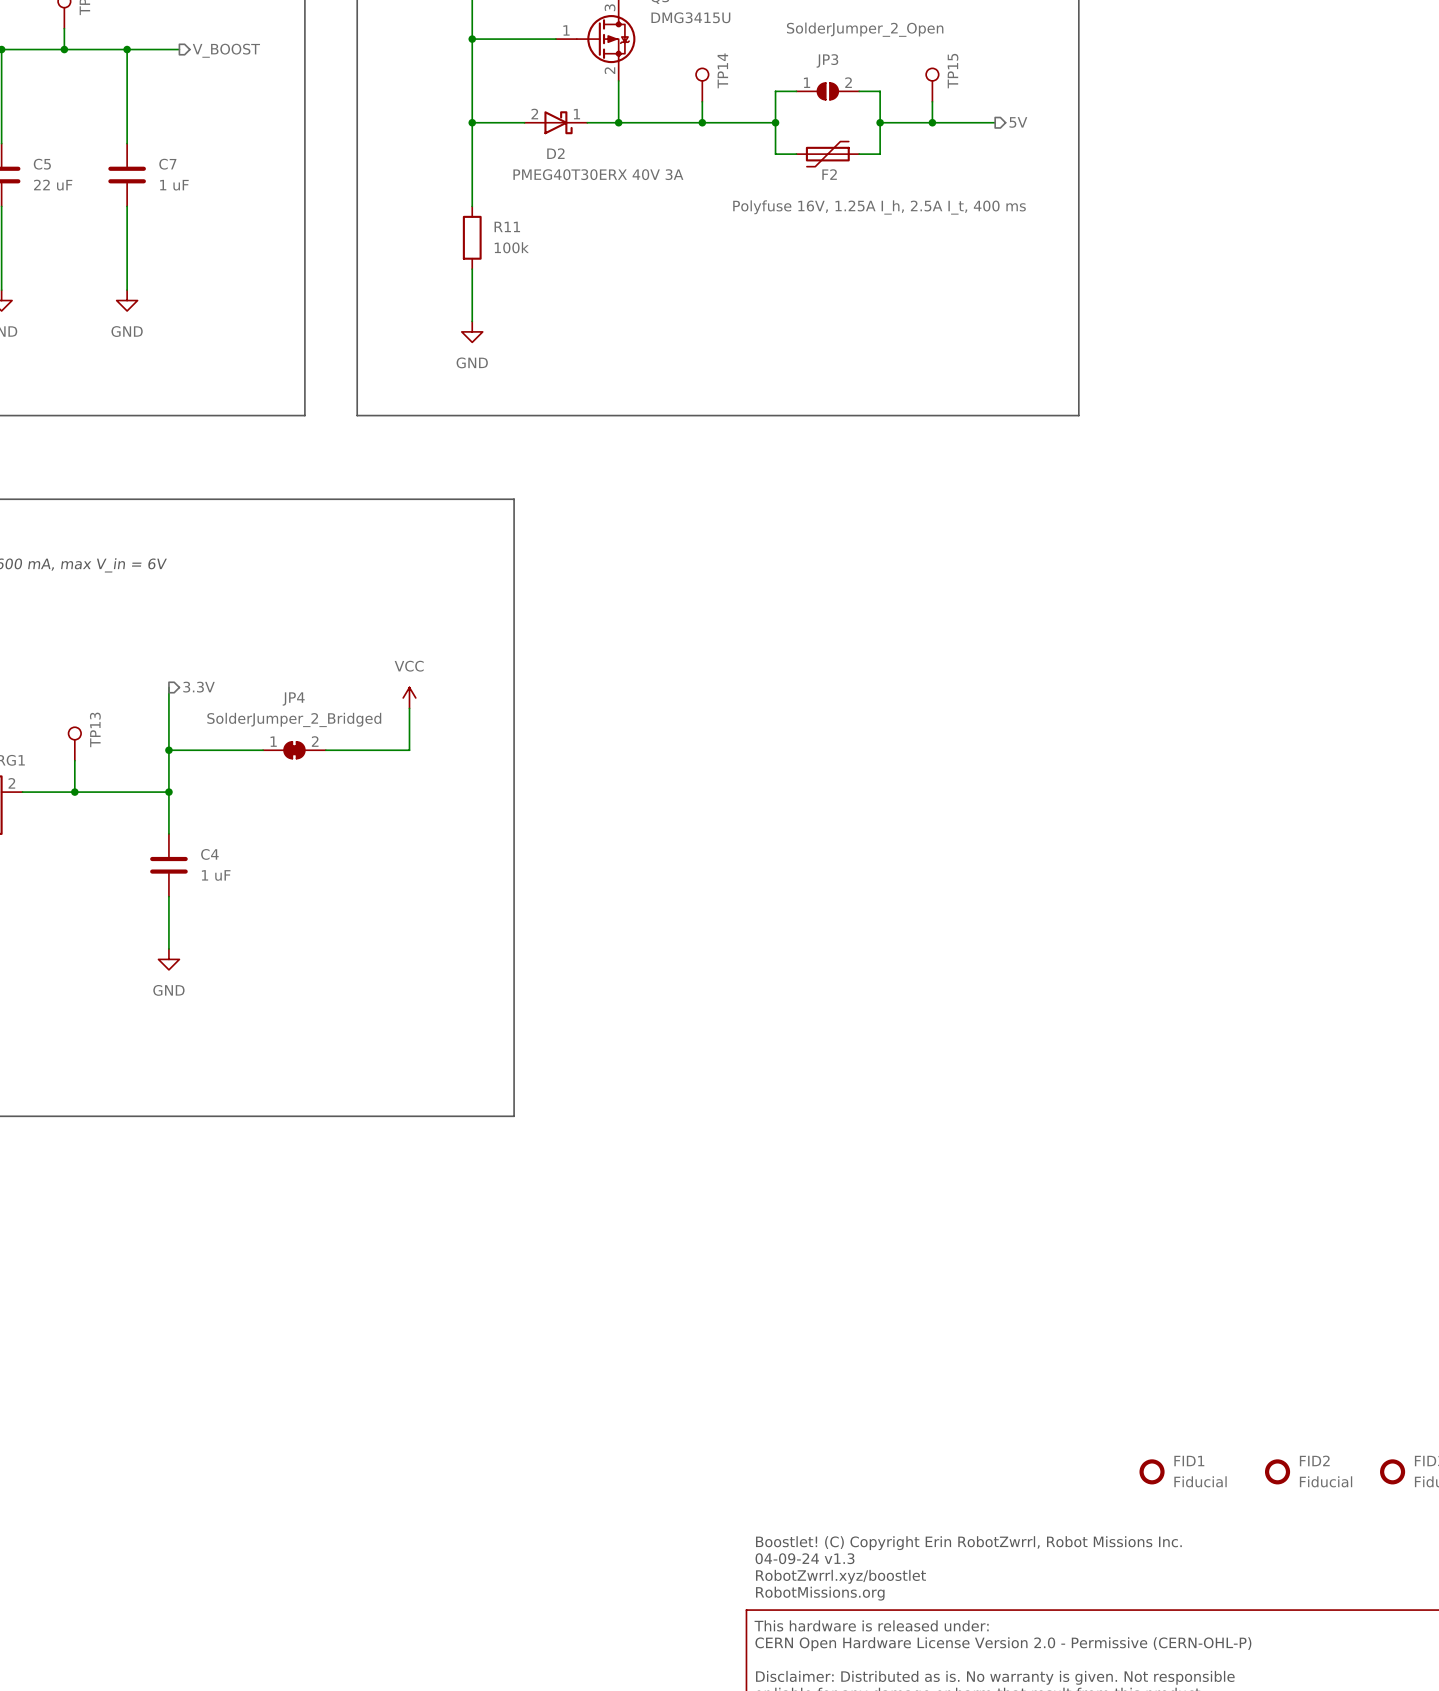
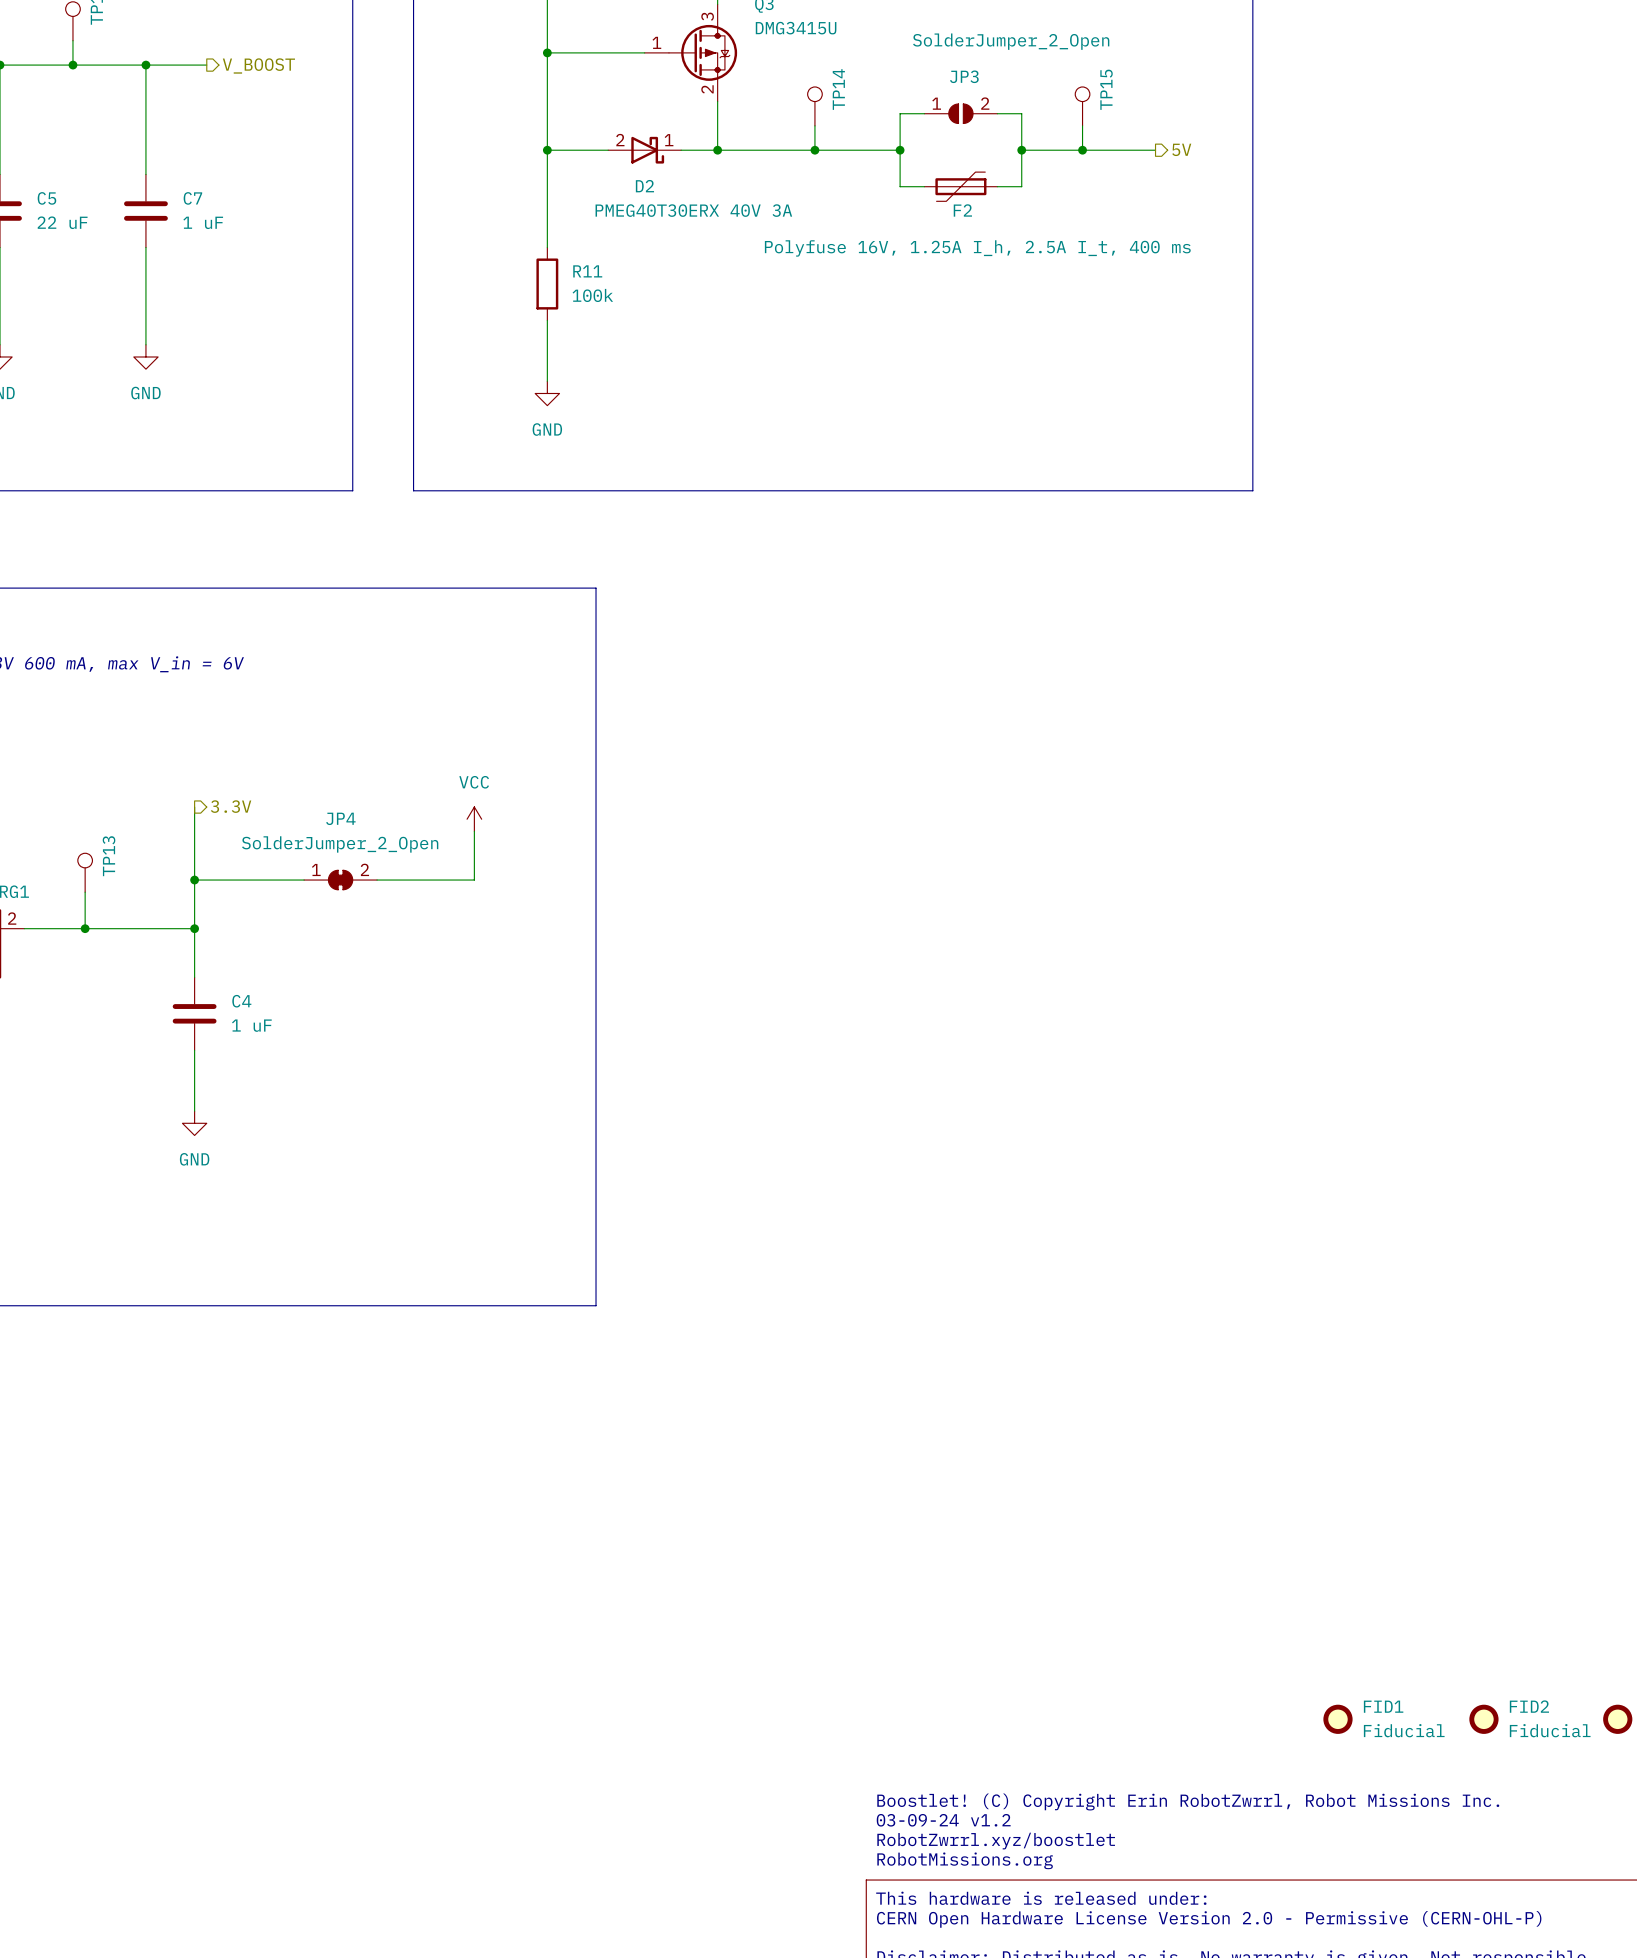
JP4 value: SolderJumper_2_Bridged (294, 719) -> SolderJumper_2_Open (340, 844)
text: 04-09-24 v1.3 (805, 1558) -> 03-09-24 v1.2 (943, 1820)

